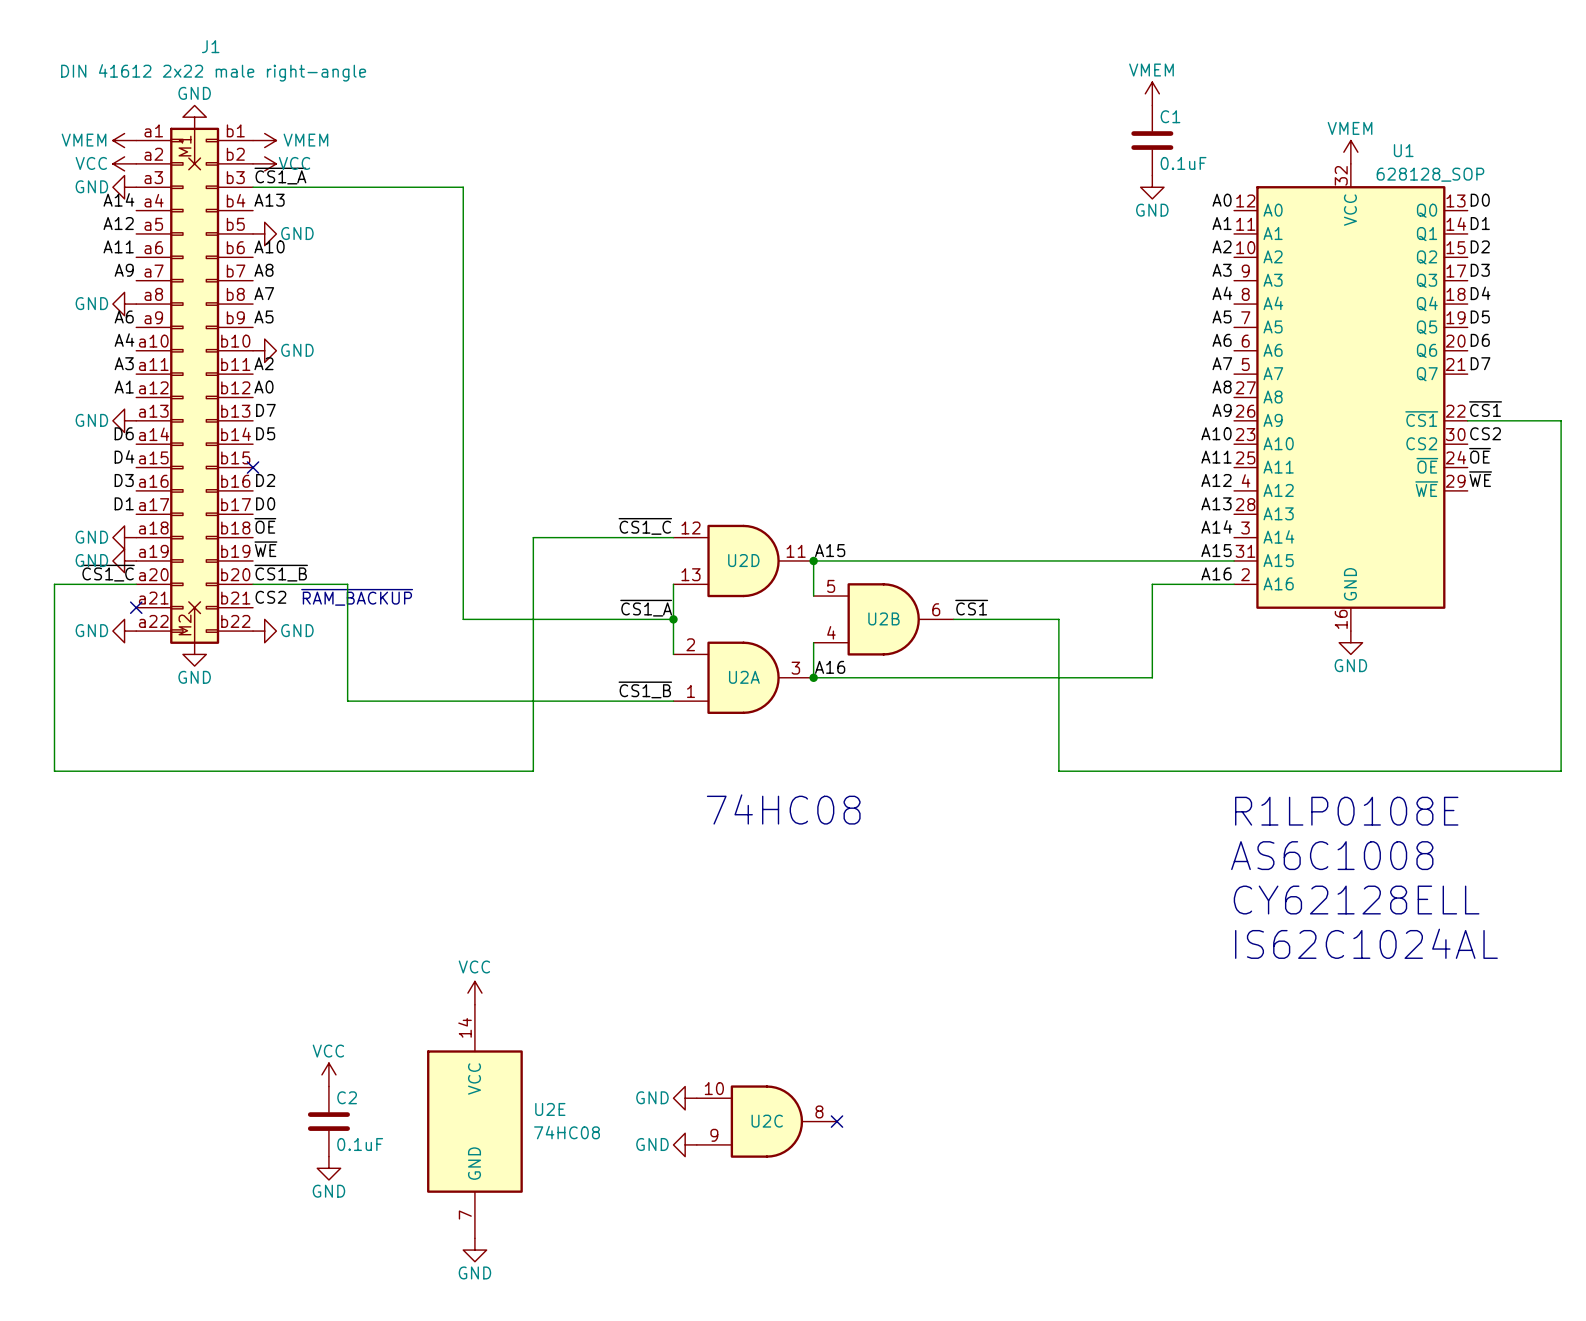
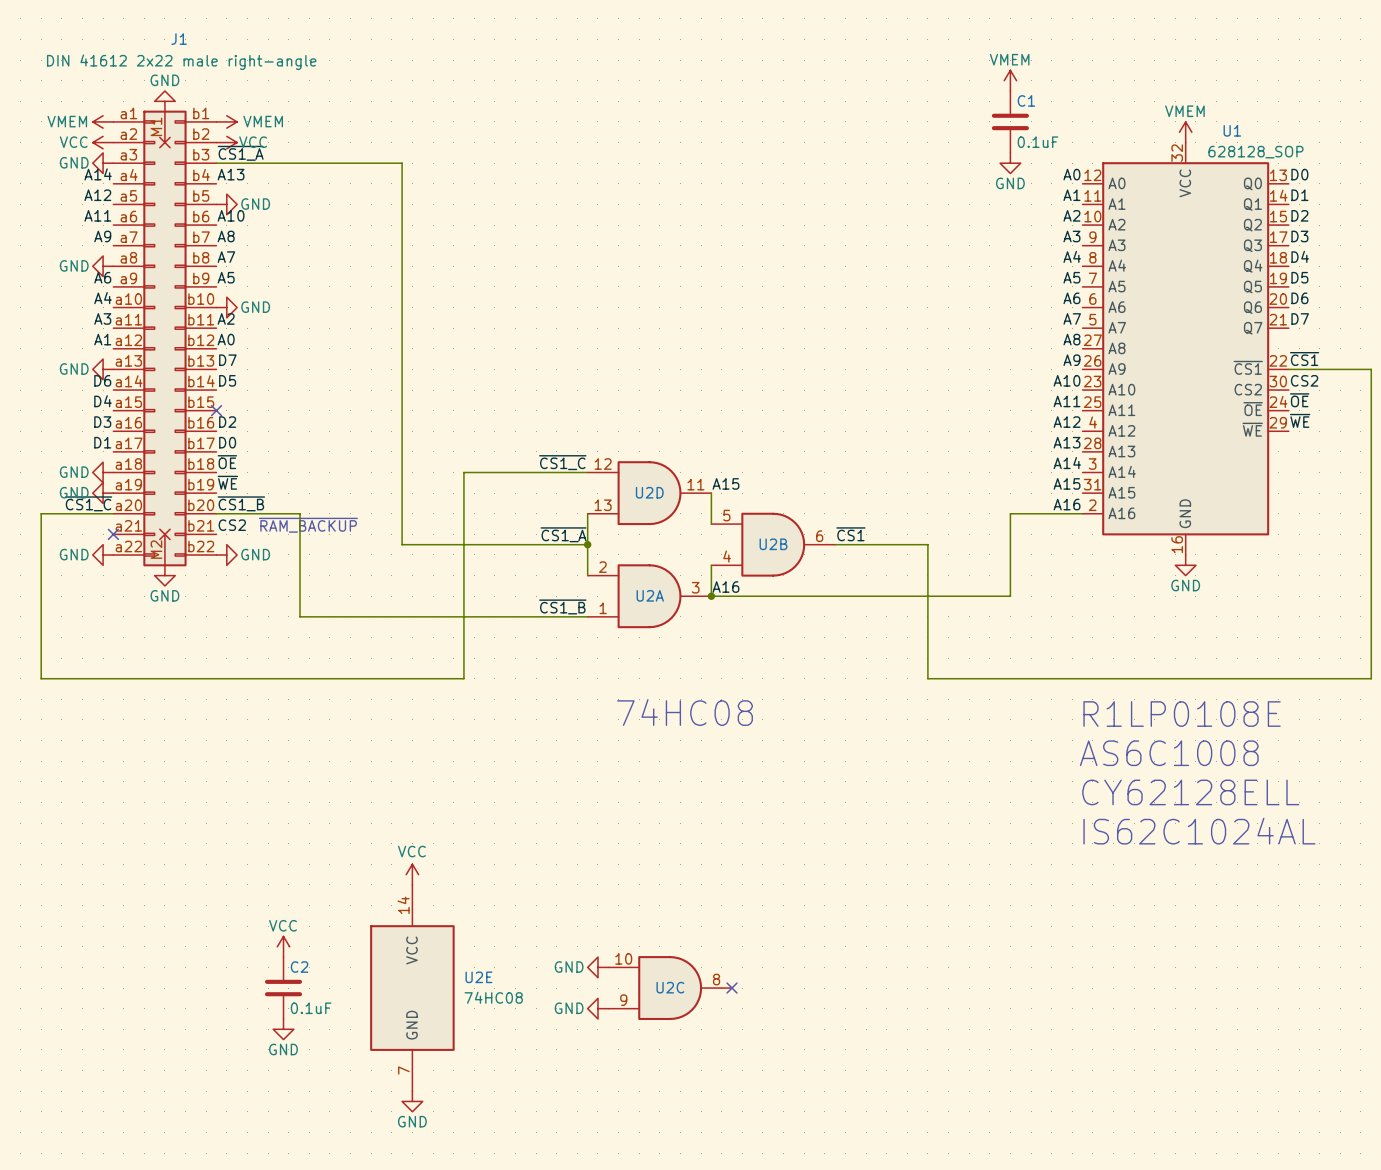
wire: (813, 560) (1234, 560) -> none
junction: (813, 560) -> none

